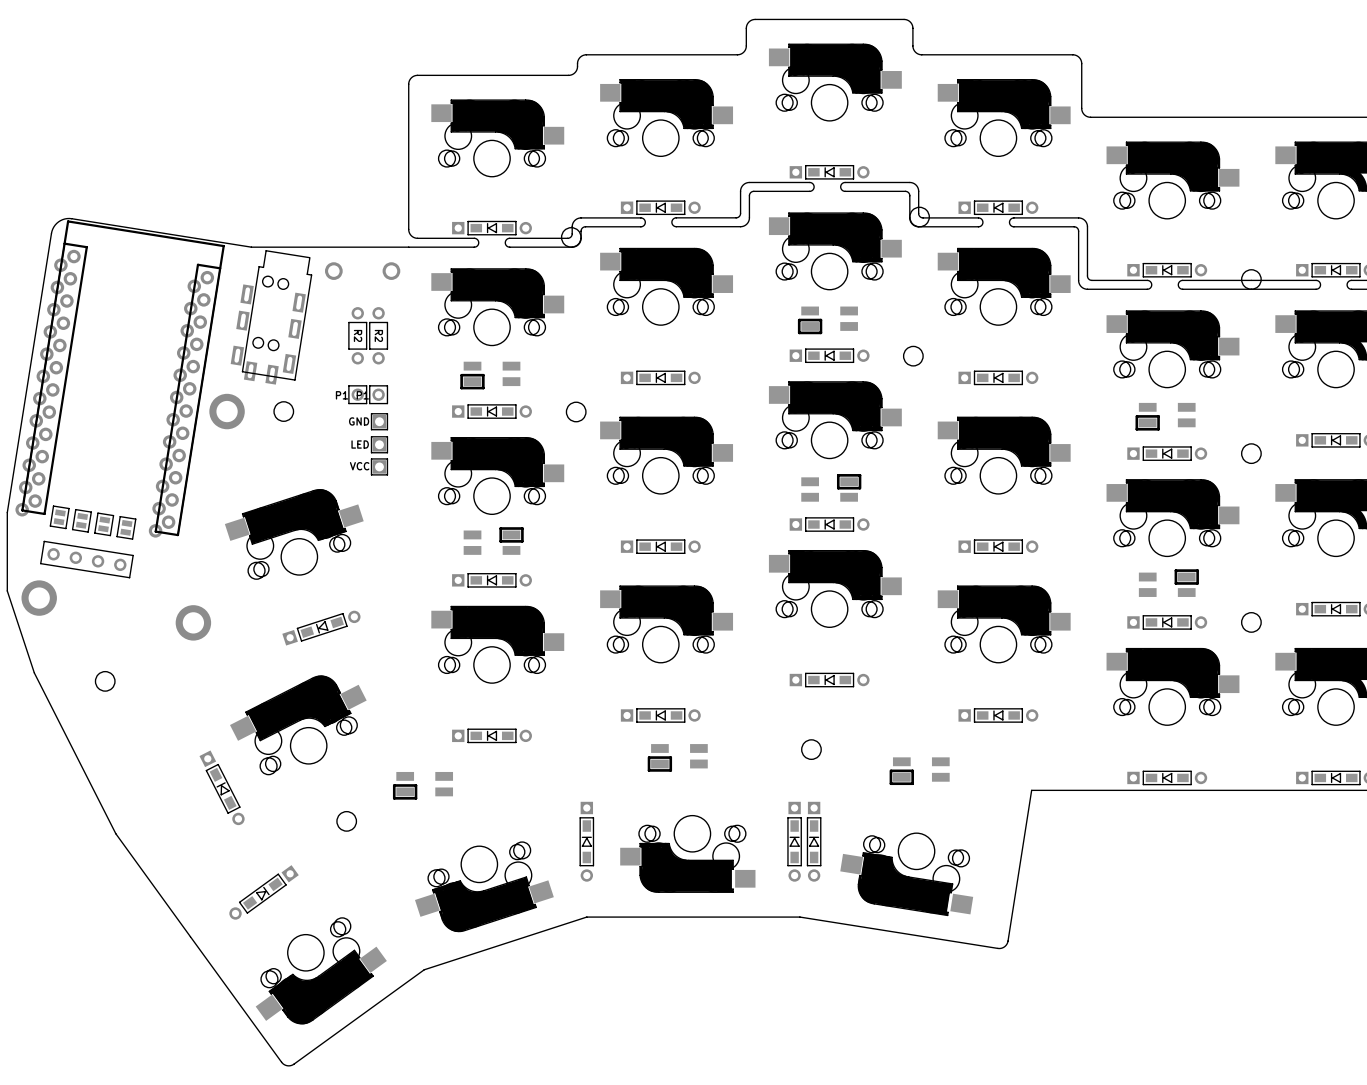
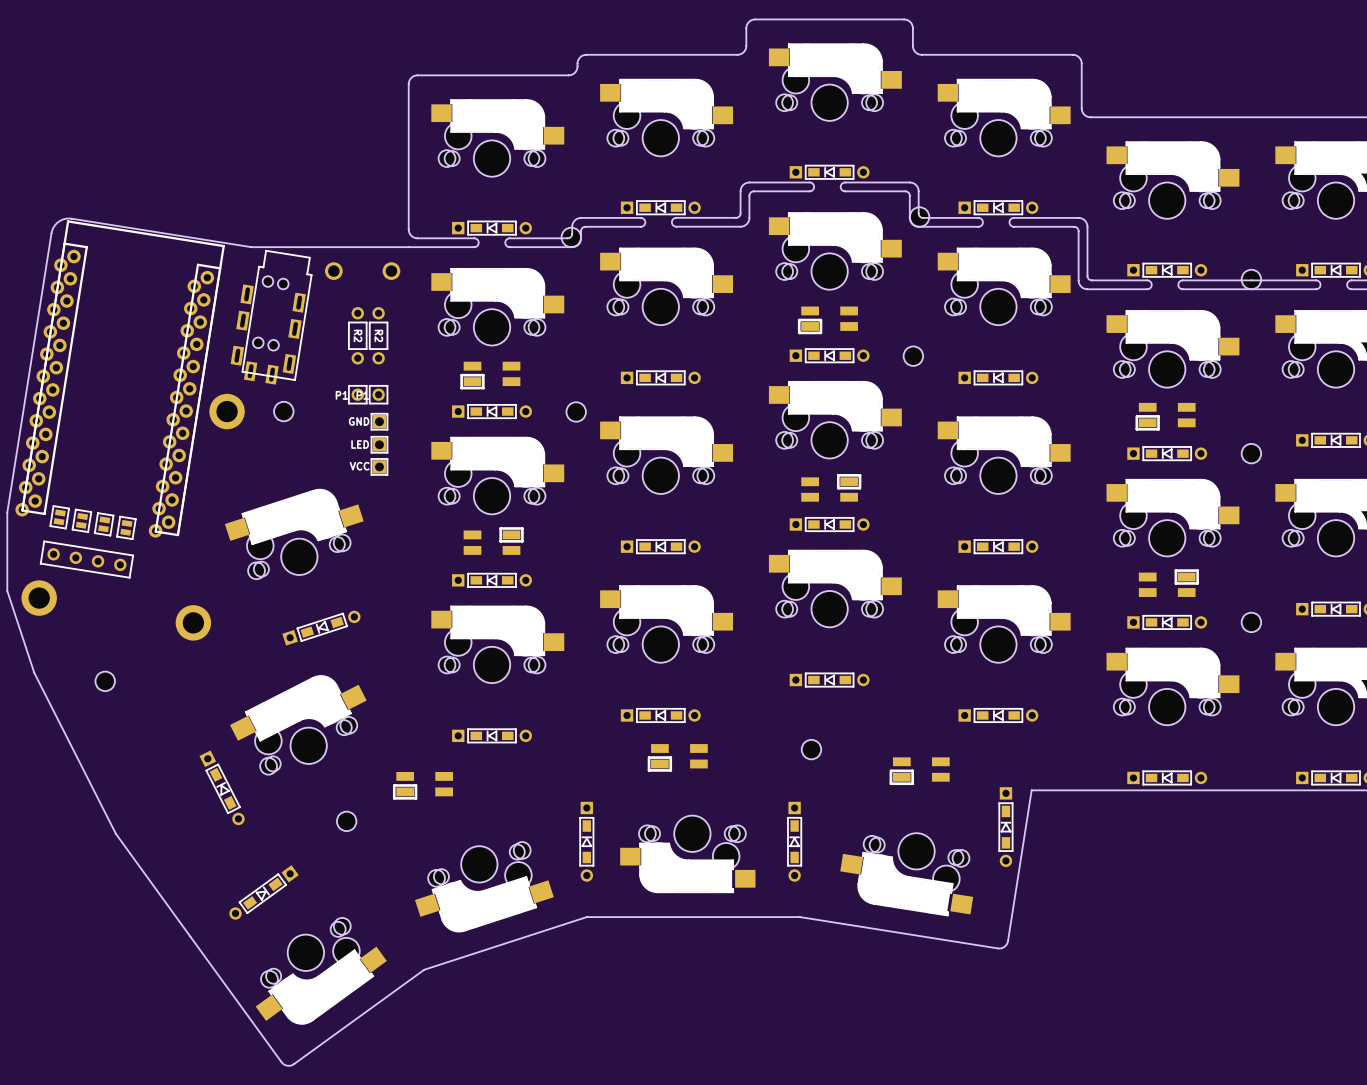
part position: (814, 841) -> (1005, 827)

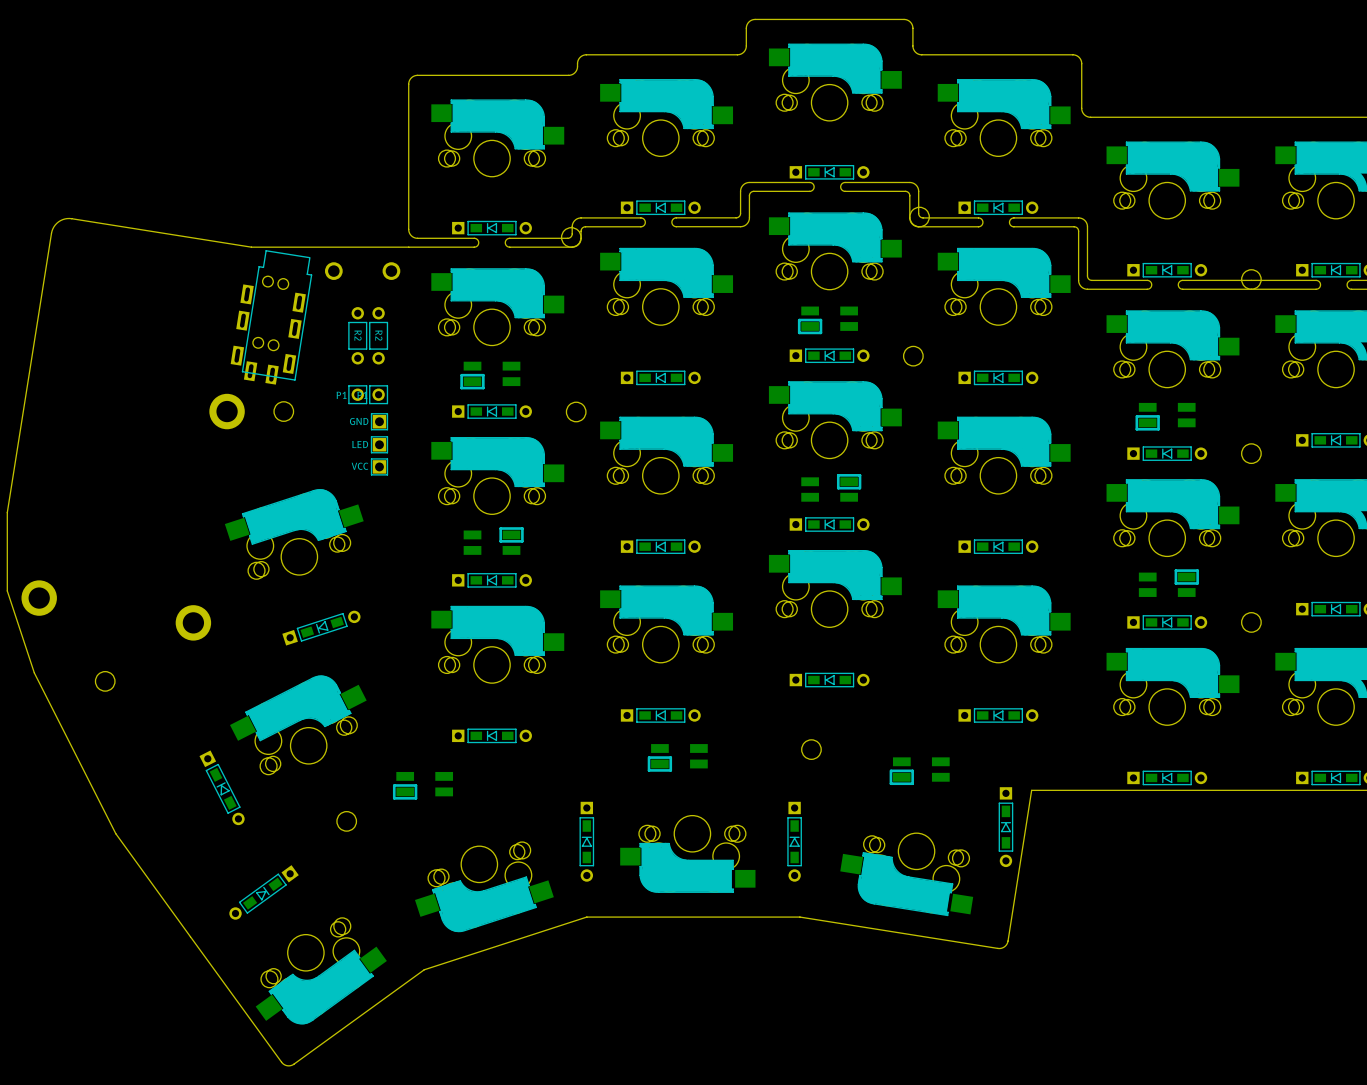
part: (120, 378) -> none
part: (59, 517) -> none
part: (81, 520) -> none
part: (104, 524) -> none
part: (126, 527) -> none
part: (86, 559) -> none

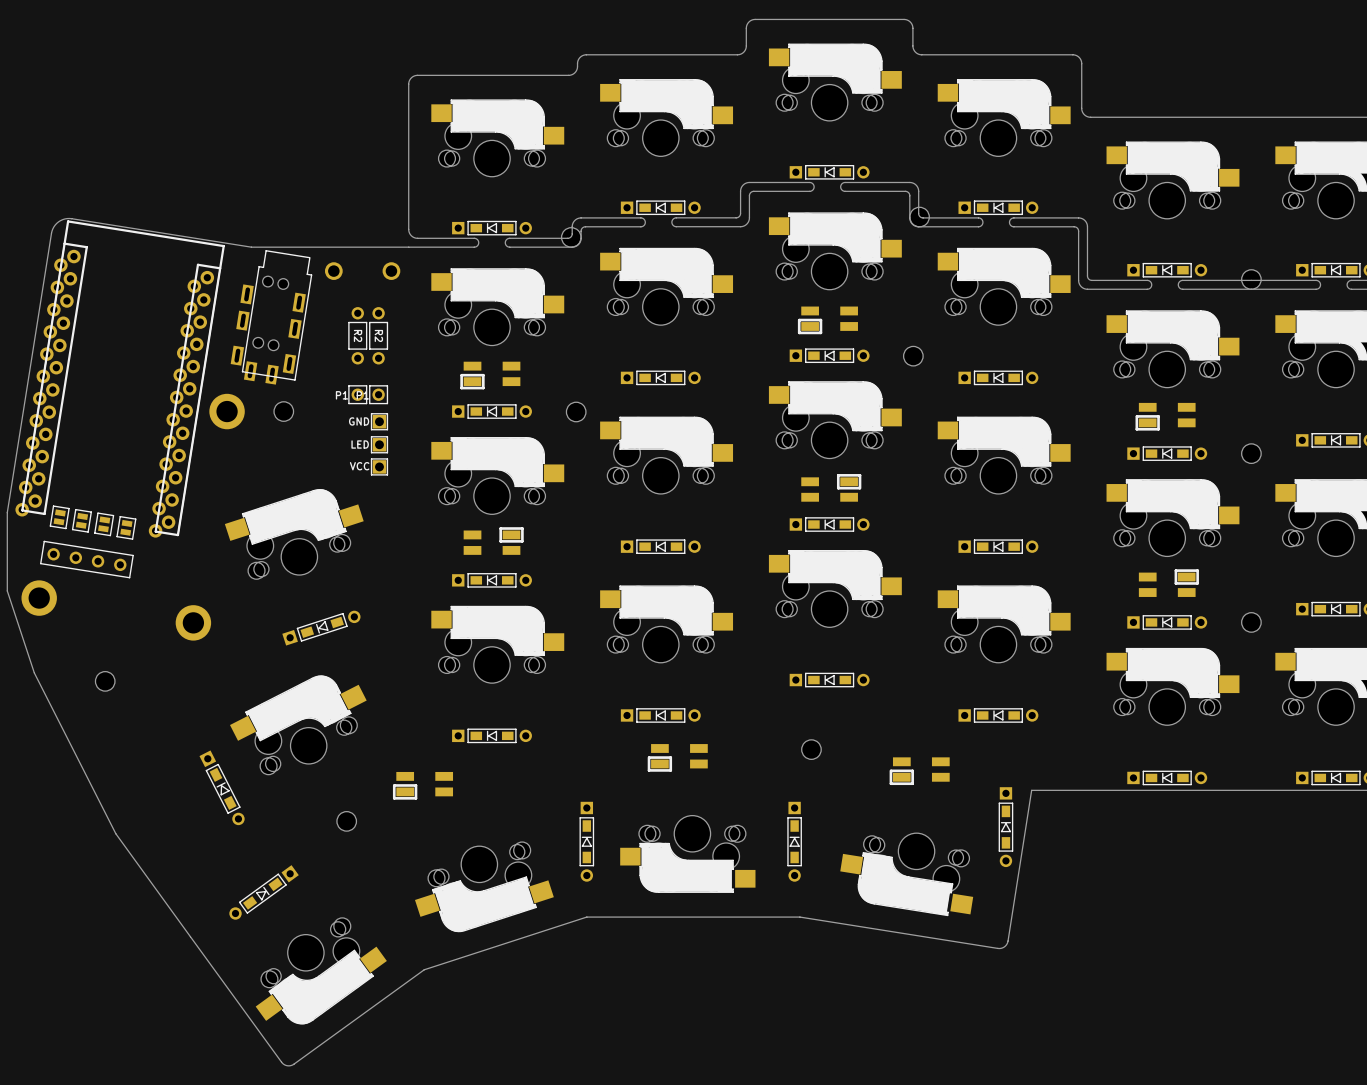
part: none -> (120, 378)
part: none -> (59, 517)
part: none -> (81, 520)
part: none -> (104, 524)
part: none -> (126, 527)
part: none -> (86, 559)

